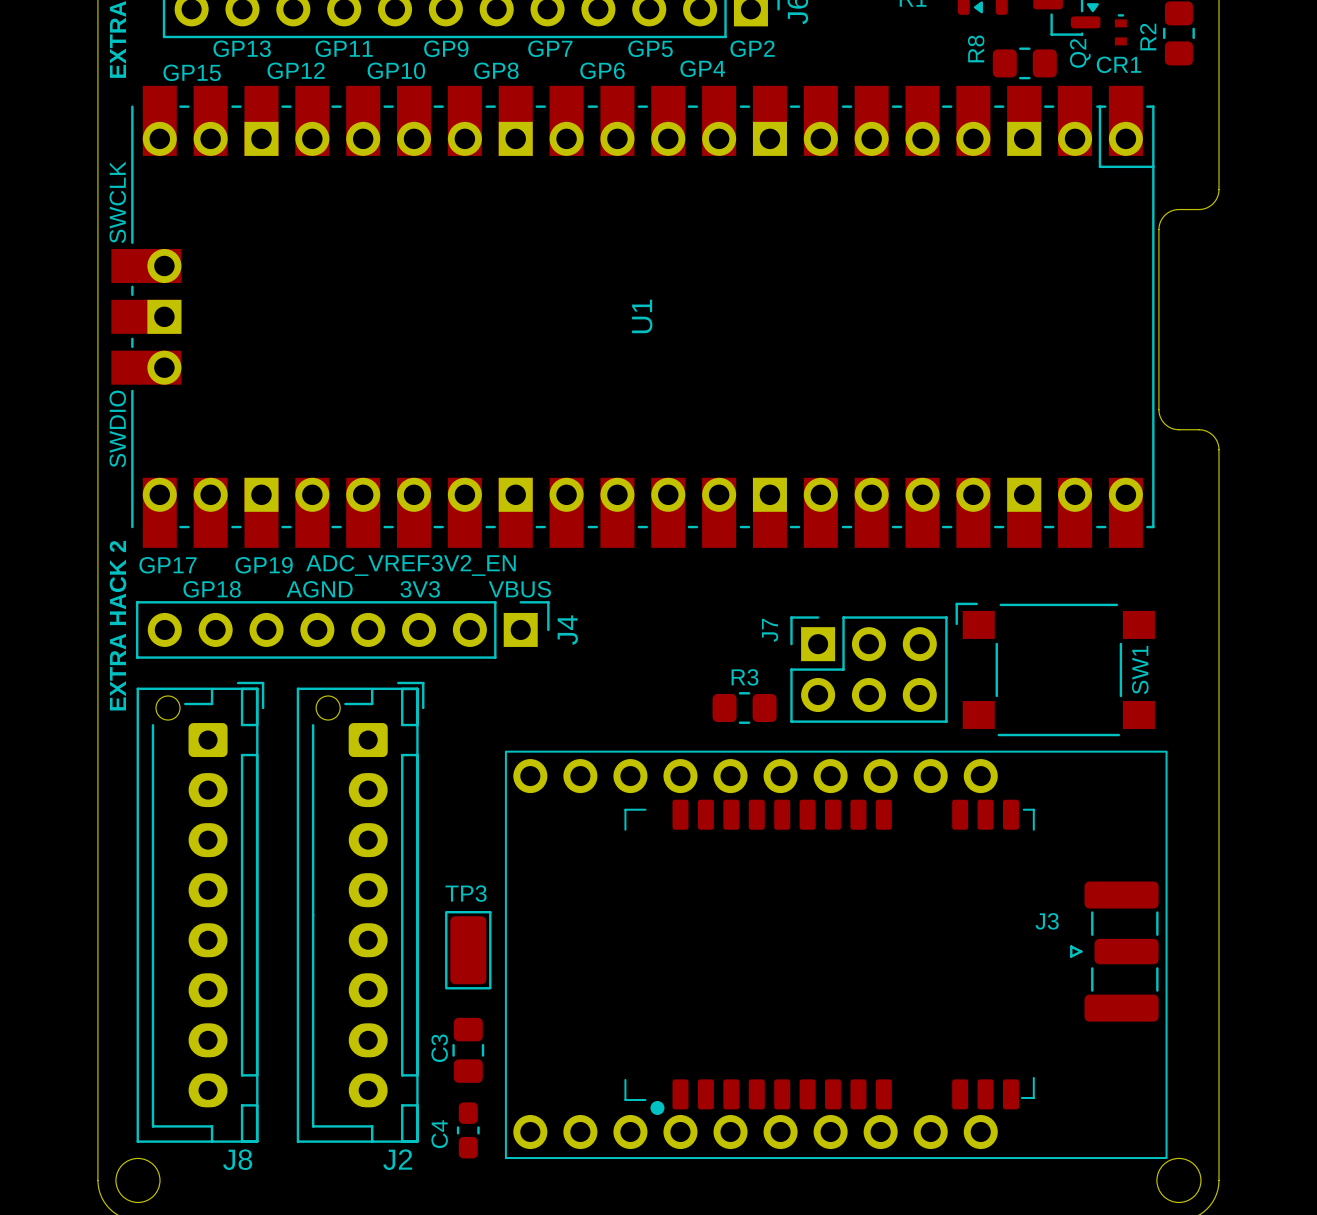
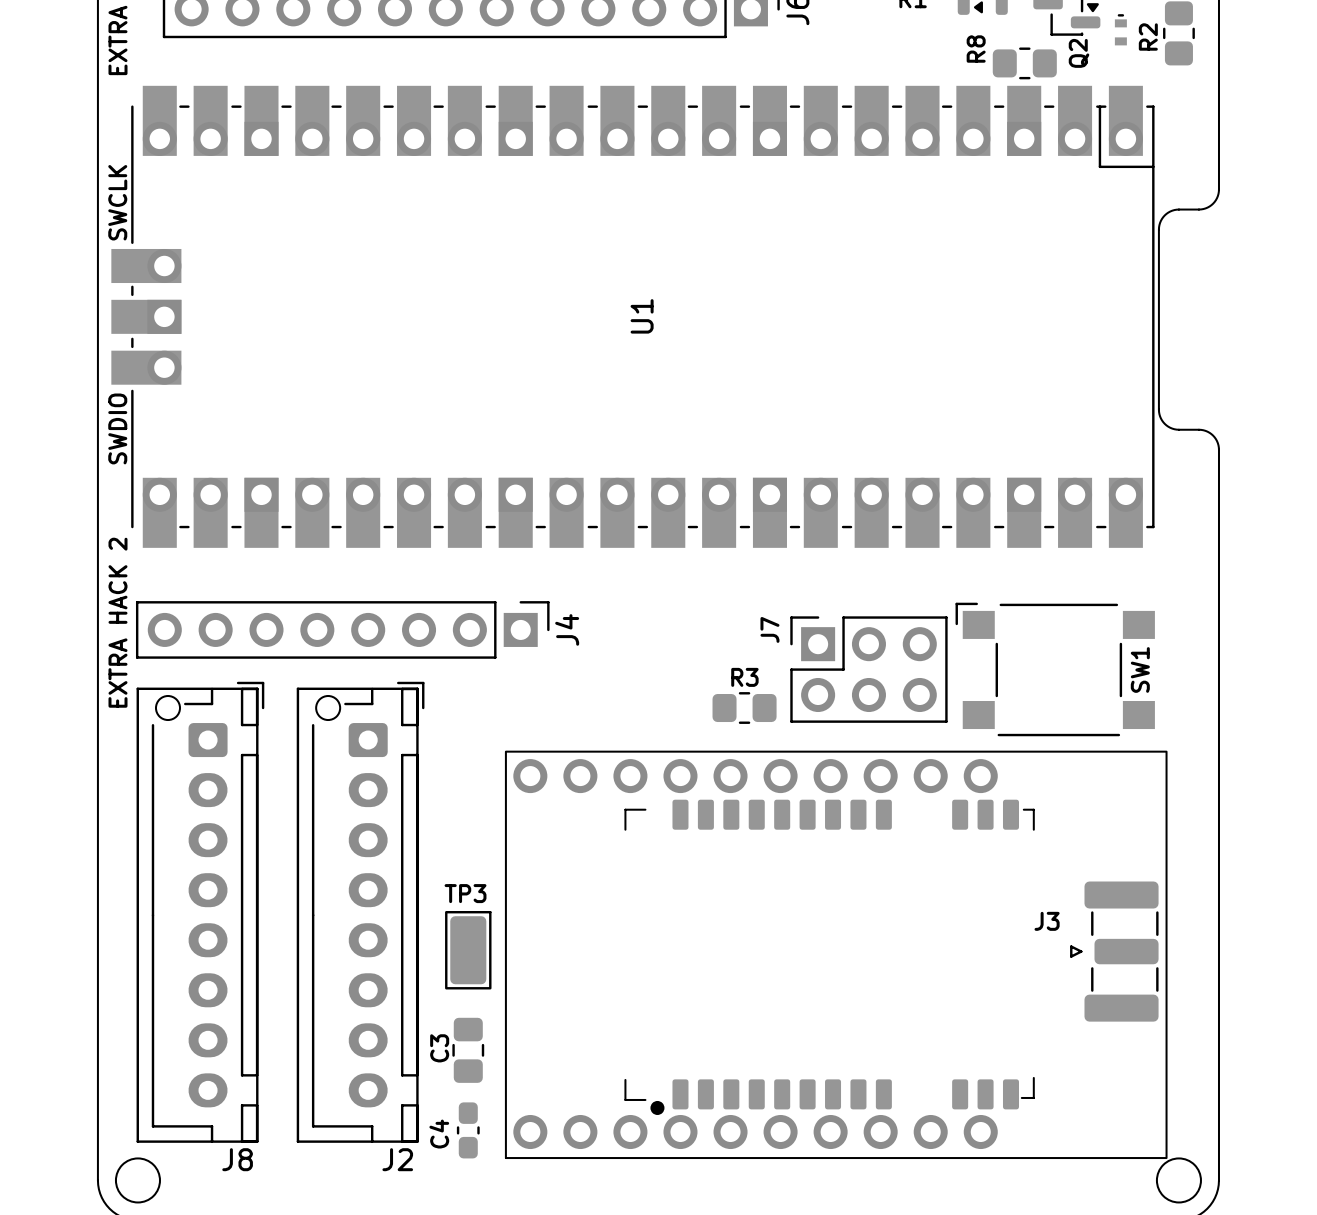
CR1 name: CR1 (1118, 64) -> none
U1 footprint: [111, 85, 1155, 548] -> [111, 85, 1155, 548]

